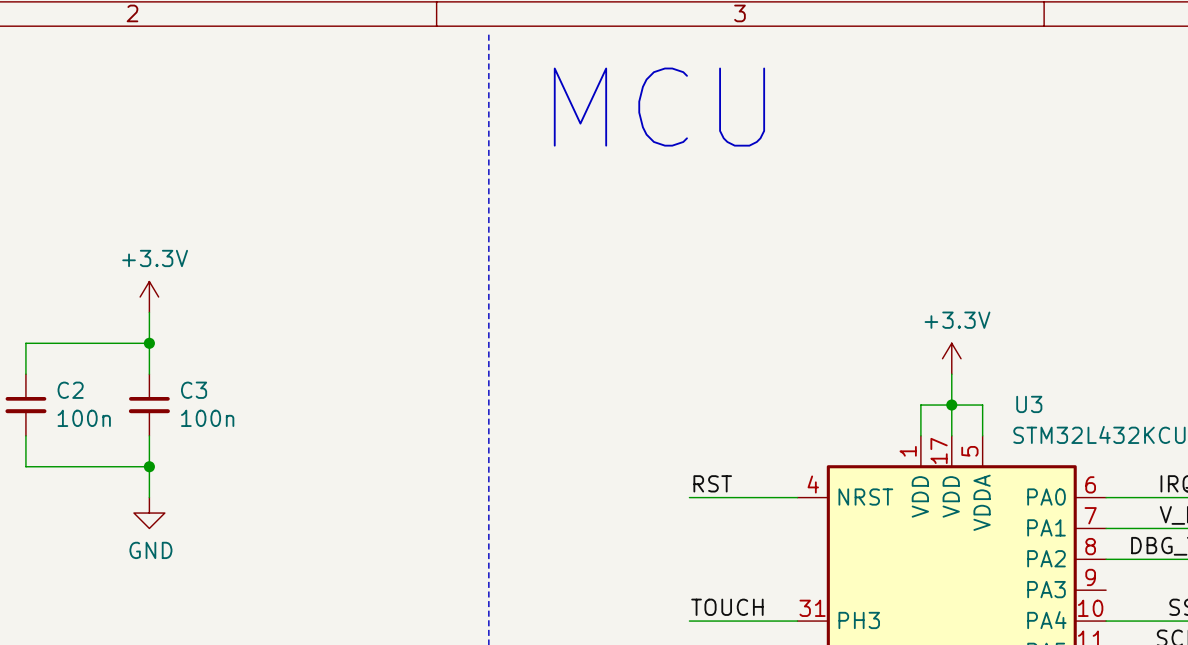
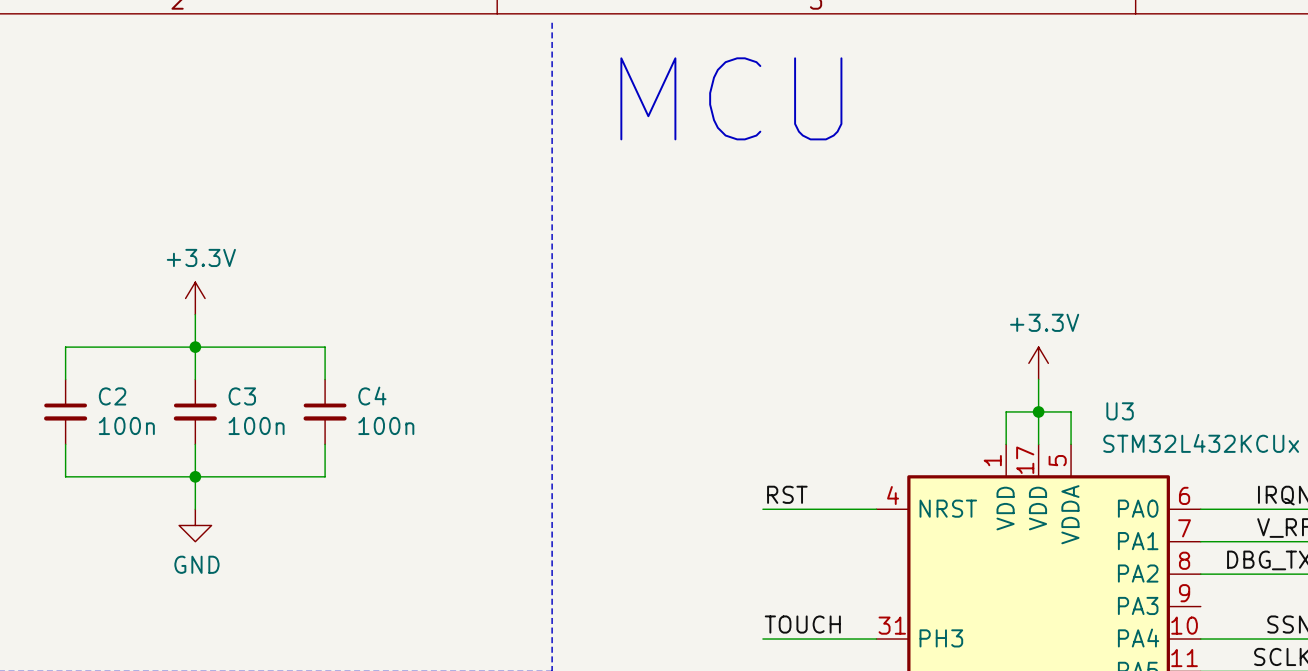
wire: none -> (195, 347) (325, 347) (325, 379)
C4: none -> 100n (325, 411)
wire: none -> (325, 444) (325, 476) (195, 476)

